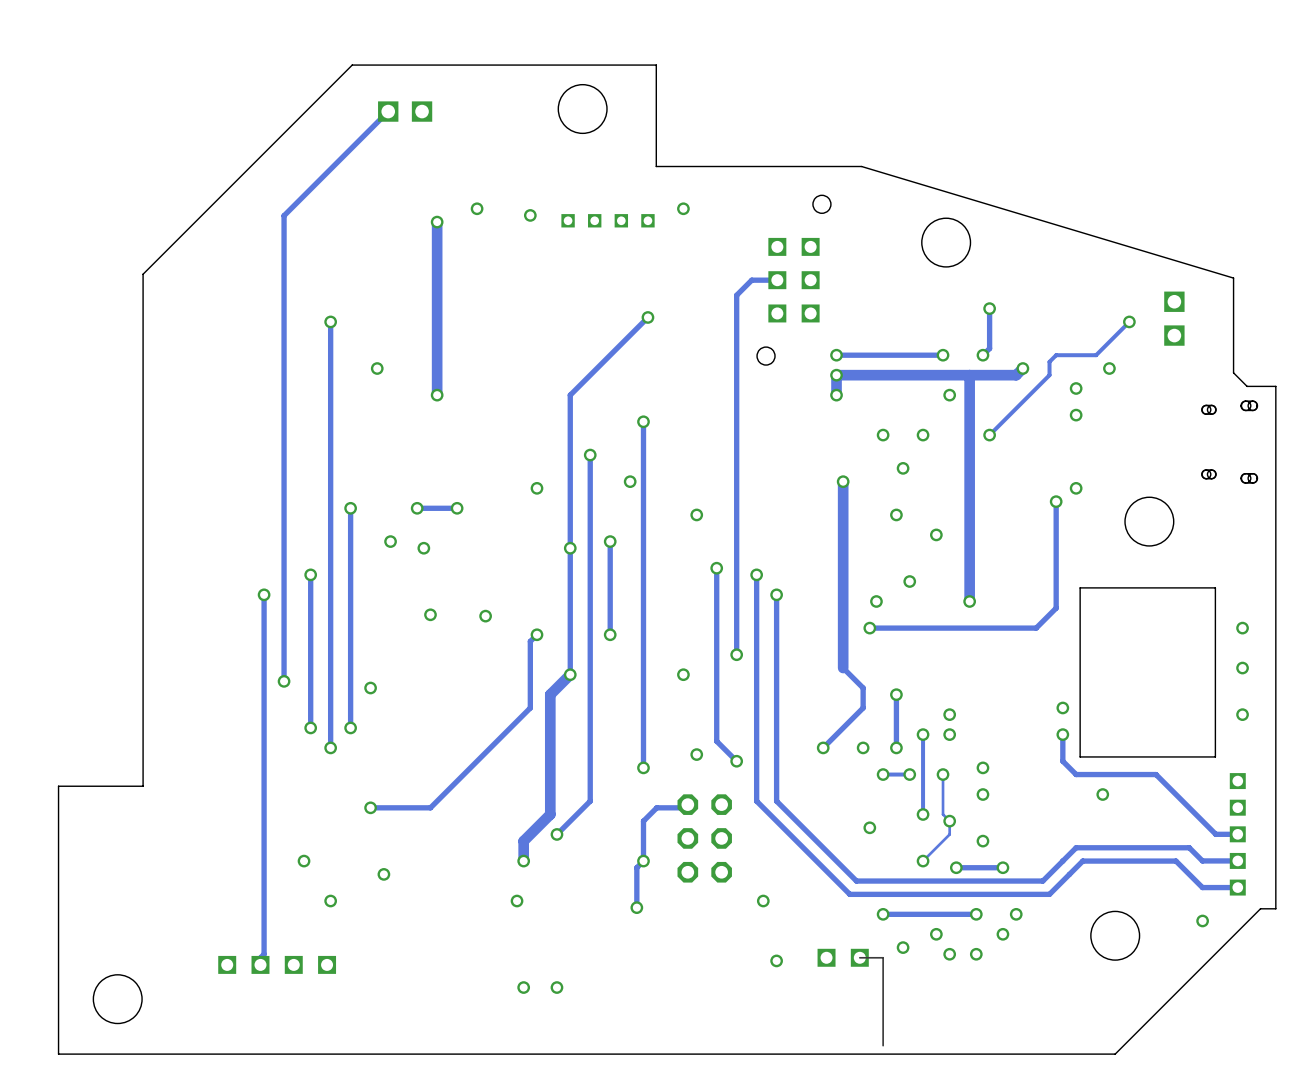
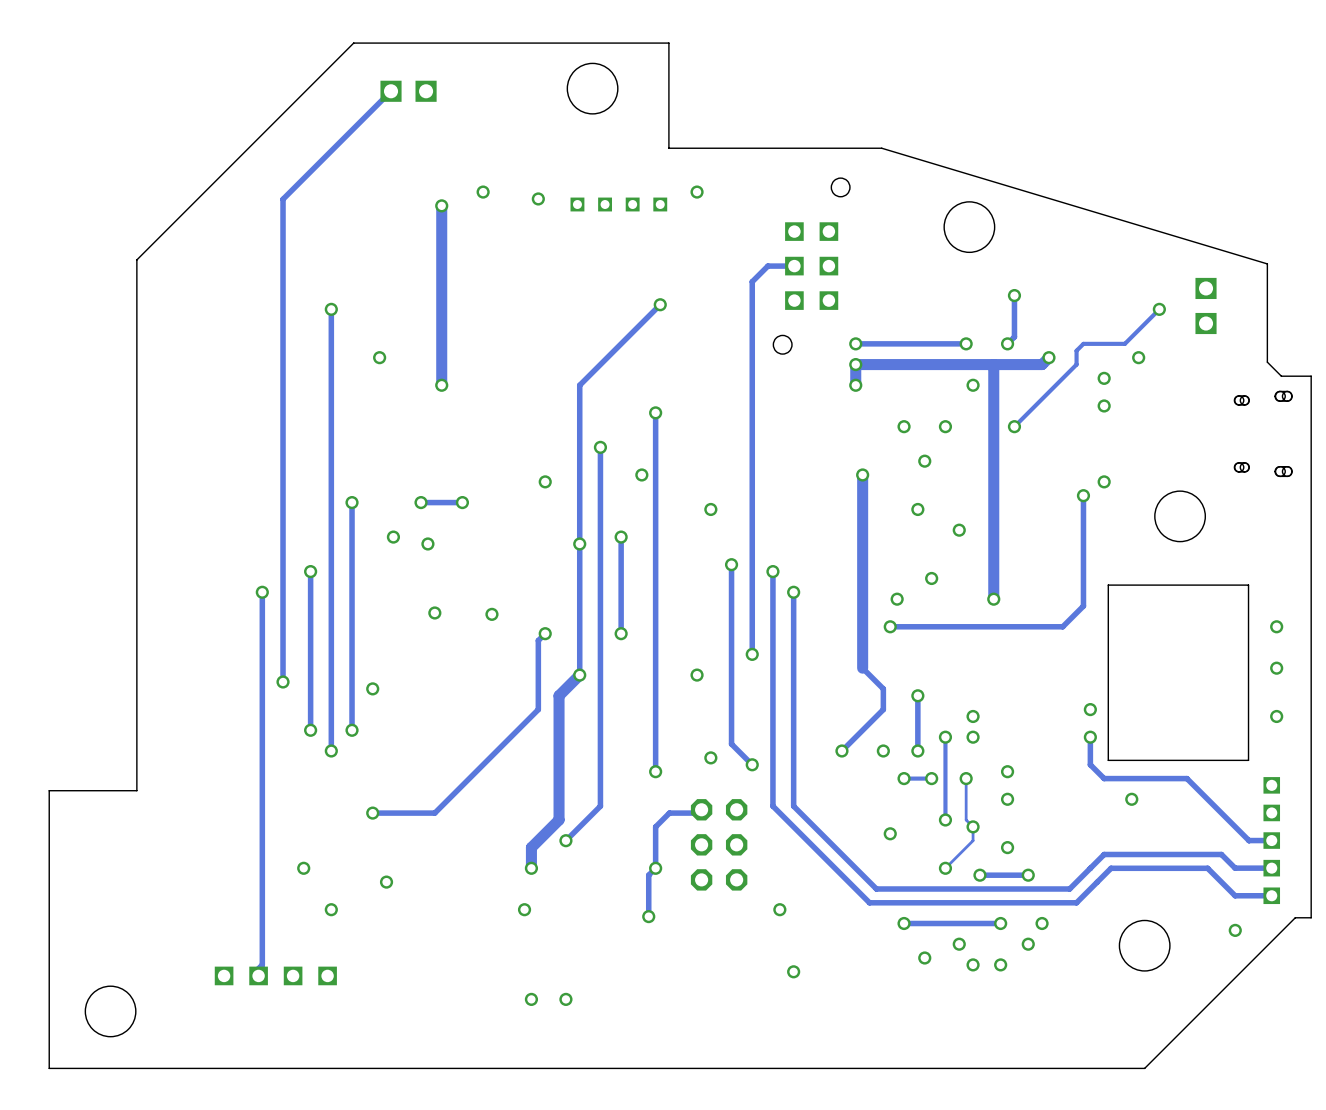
part: (850, 997) -> none

